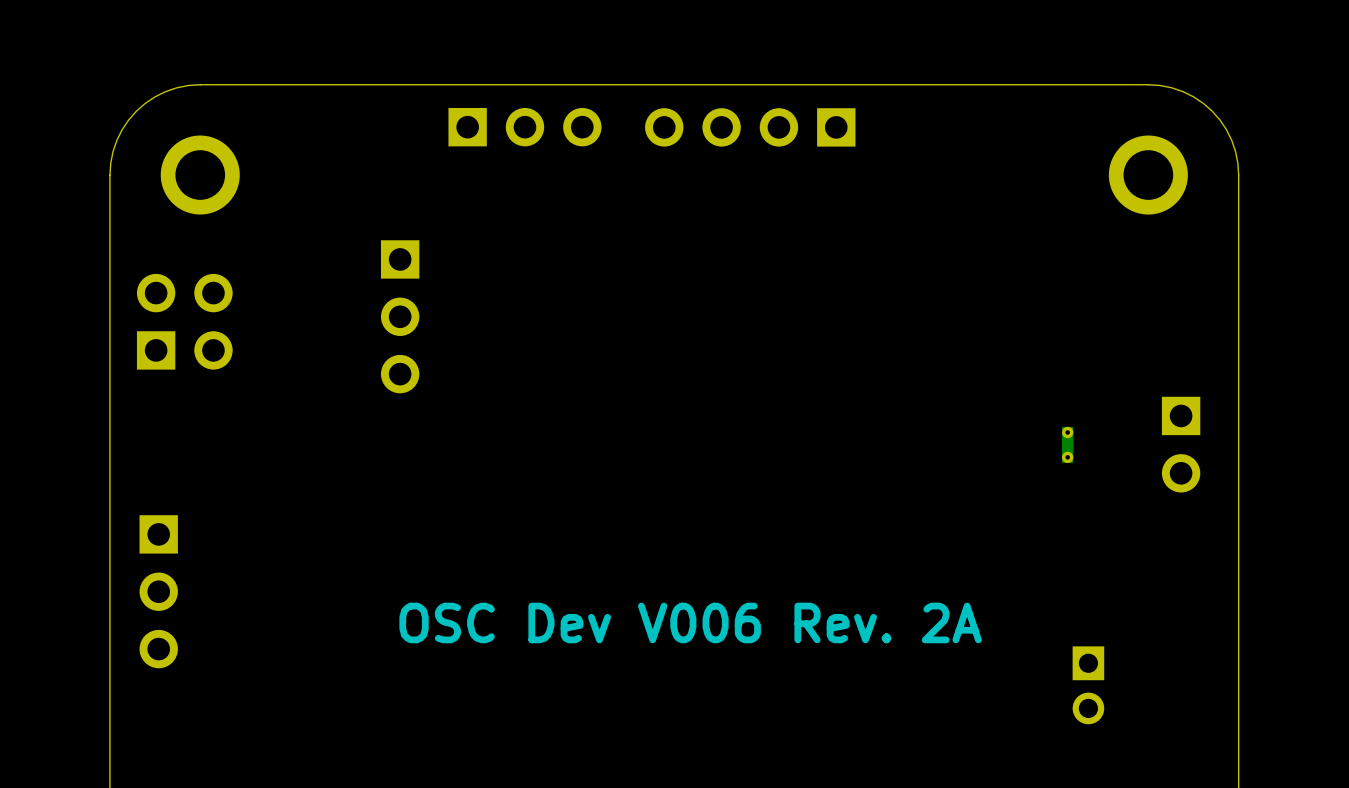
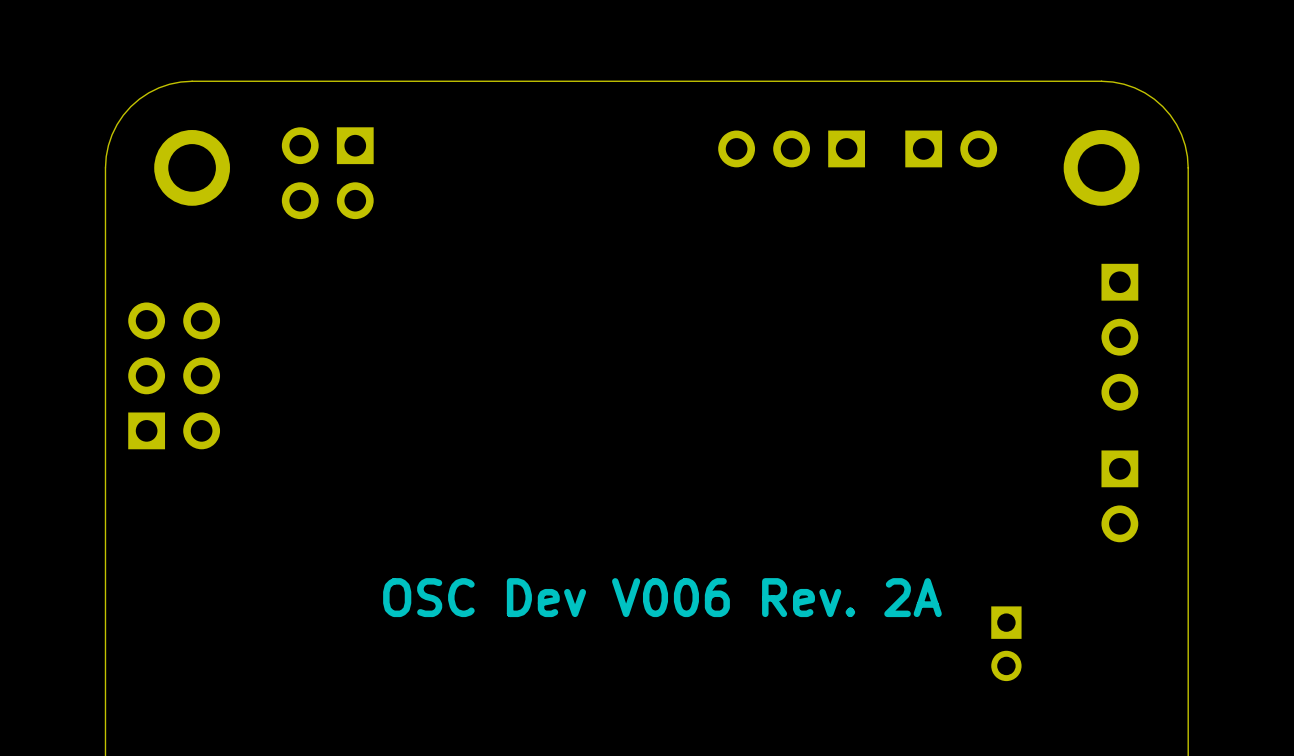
part: (524, 127) -> none
part: (750, 127) -> none
part: none -> (791, 148)
part: none -> (951, 148)
part: (400, 316) -> none
part rotation: 0° (184, 321) -> 180° (327, 173)
part position: (184, 321) -> (327, 173)
part: none -> (1119, 337)
part: none -> (174, 375)
part: (1067, 444) -> none
part position: (1181, 444) -> (1119, 496)
part: (158, 591) -> none
part position: (1088, 685) -> (1006, 643)

